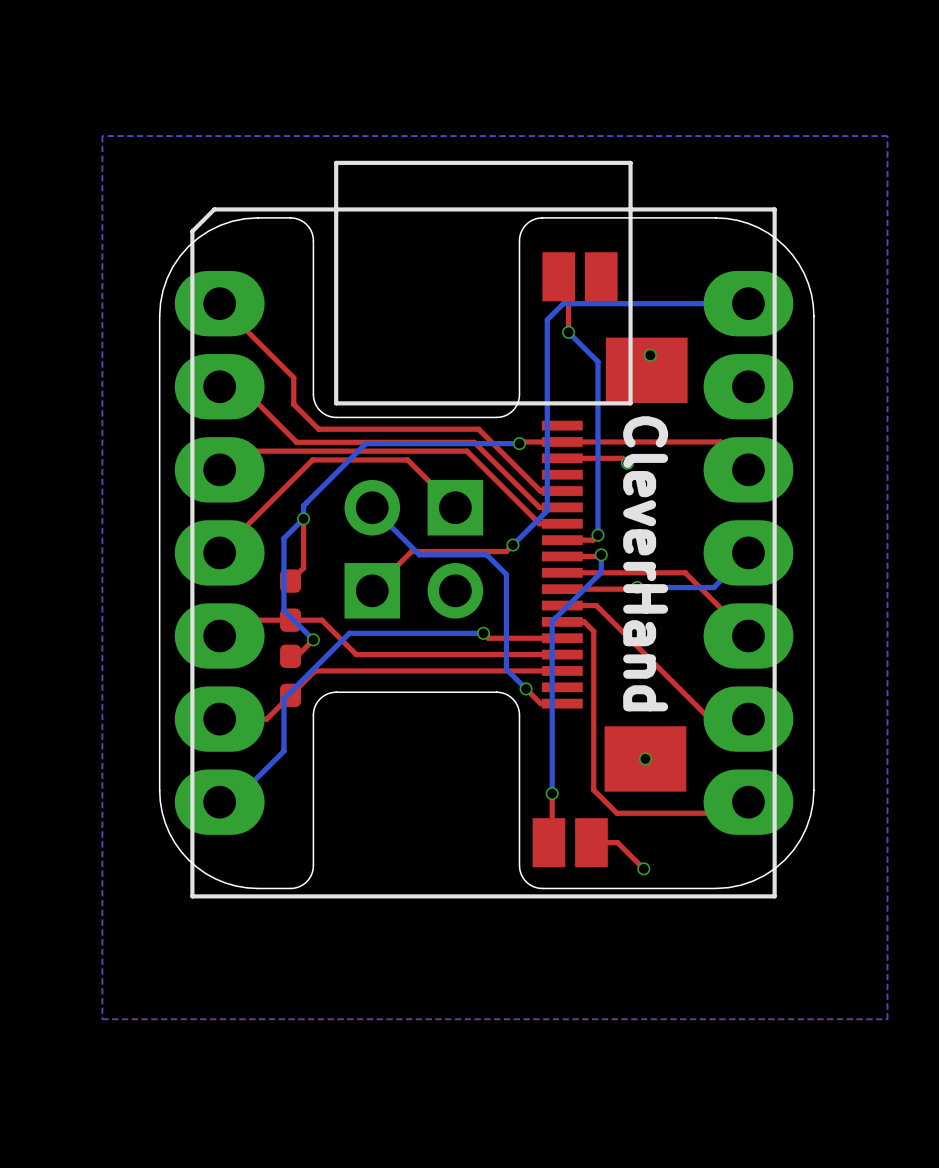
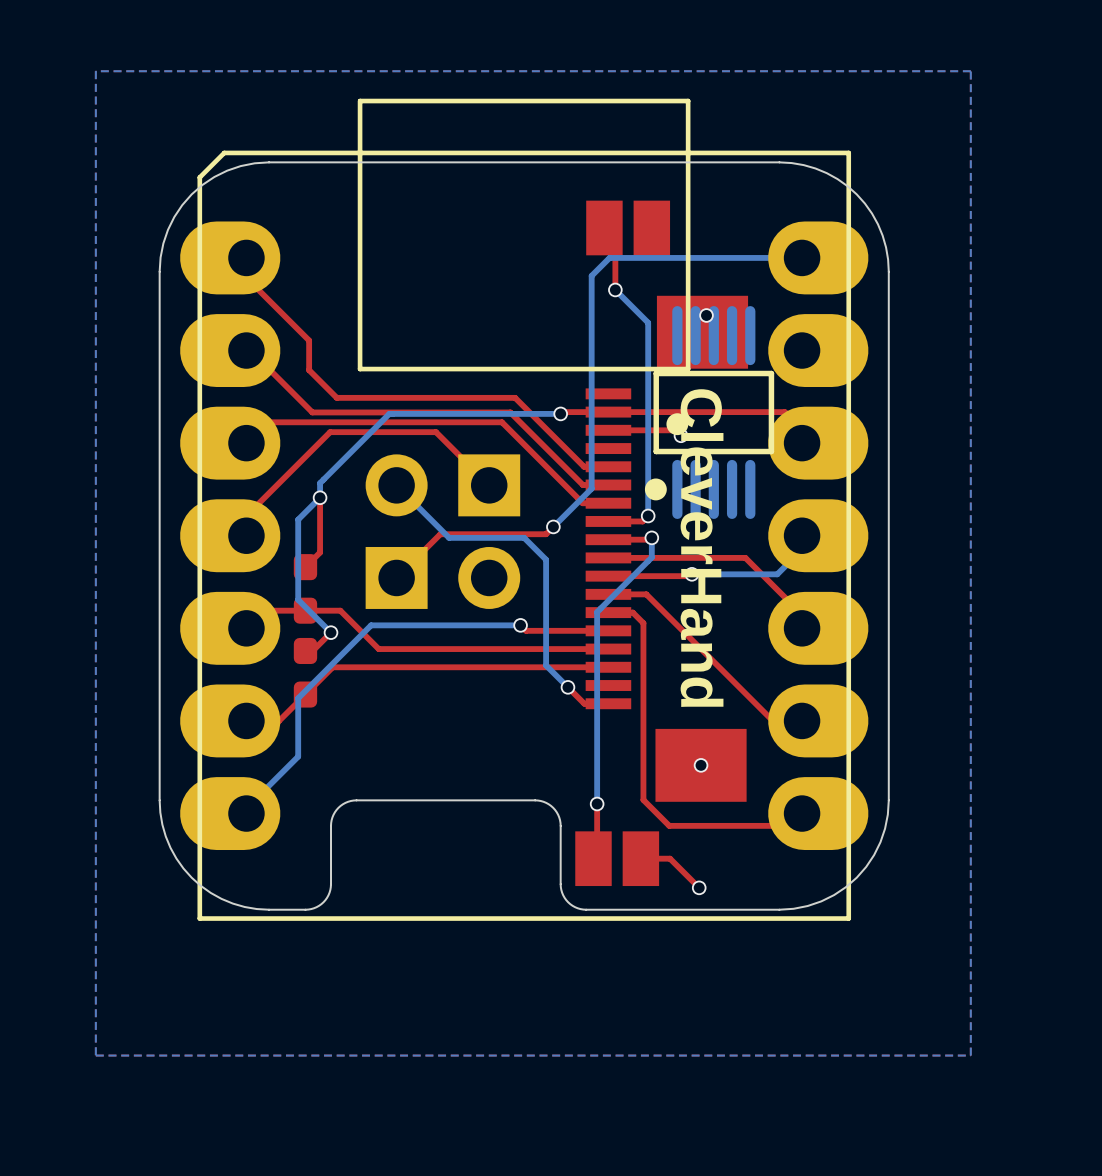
part footprint: [174, 160, 794, 899] -> [180, 98, 869, 921]
board edge: (542, 217) (528, 222) (520, 235) (519, 397) (515, 406) (510, 412) (496, 417) (336, 417) (328, 416) (320, 410) (315, 404) (313, 394) (313, 238) (311, 230) (304, 222) (290, 217) -> (586, 162) (305, 162)
part: none -> (709, 412)
board edge: (519, 813) (518, 710) (510, 697) (496, 692) (336, 692) (324, 695) (316, 702) (313, 712) (313, 813) -> (560, 825) (558, 814) (553, 807) (546, 802) (535, 800) (353, 800) (342, 804) (336, 809) (331, 825)

